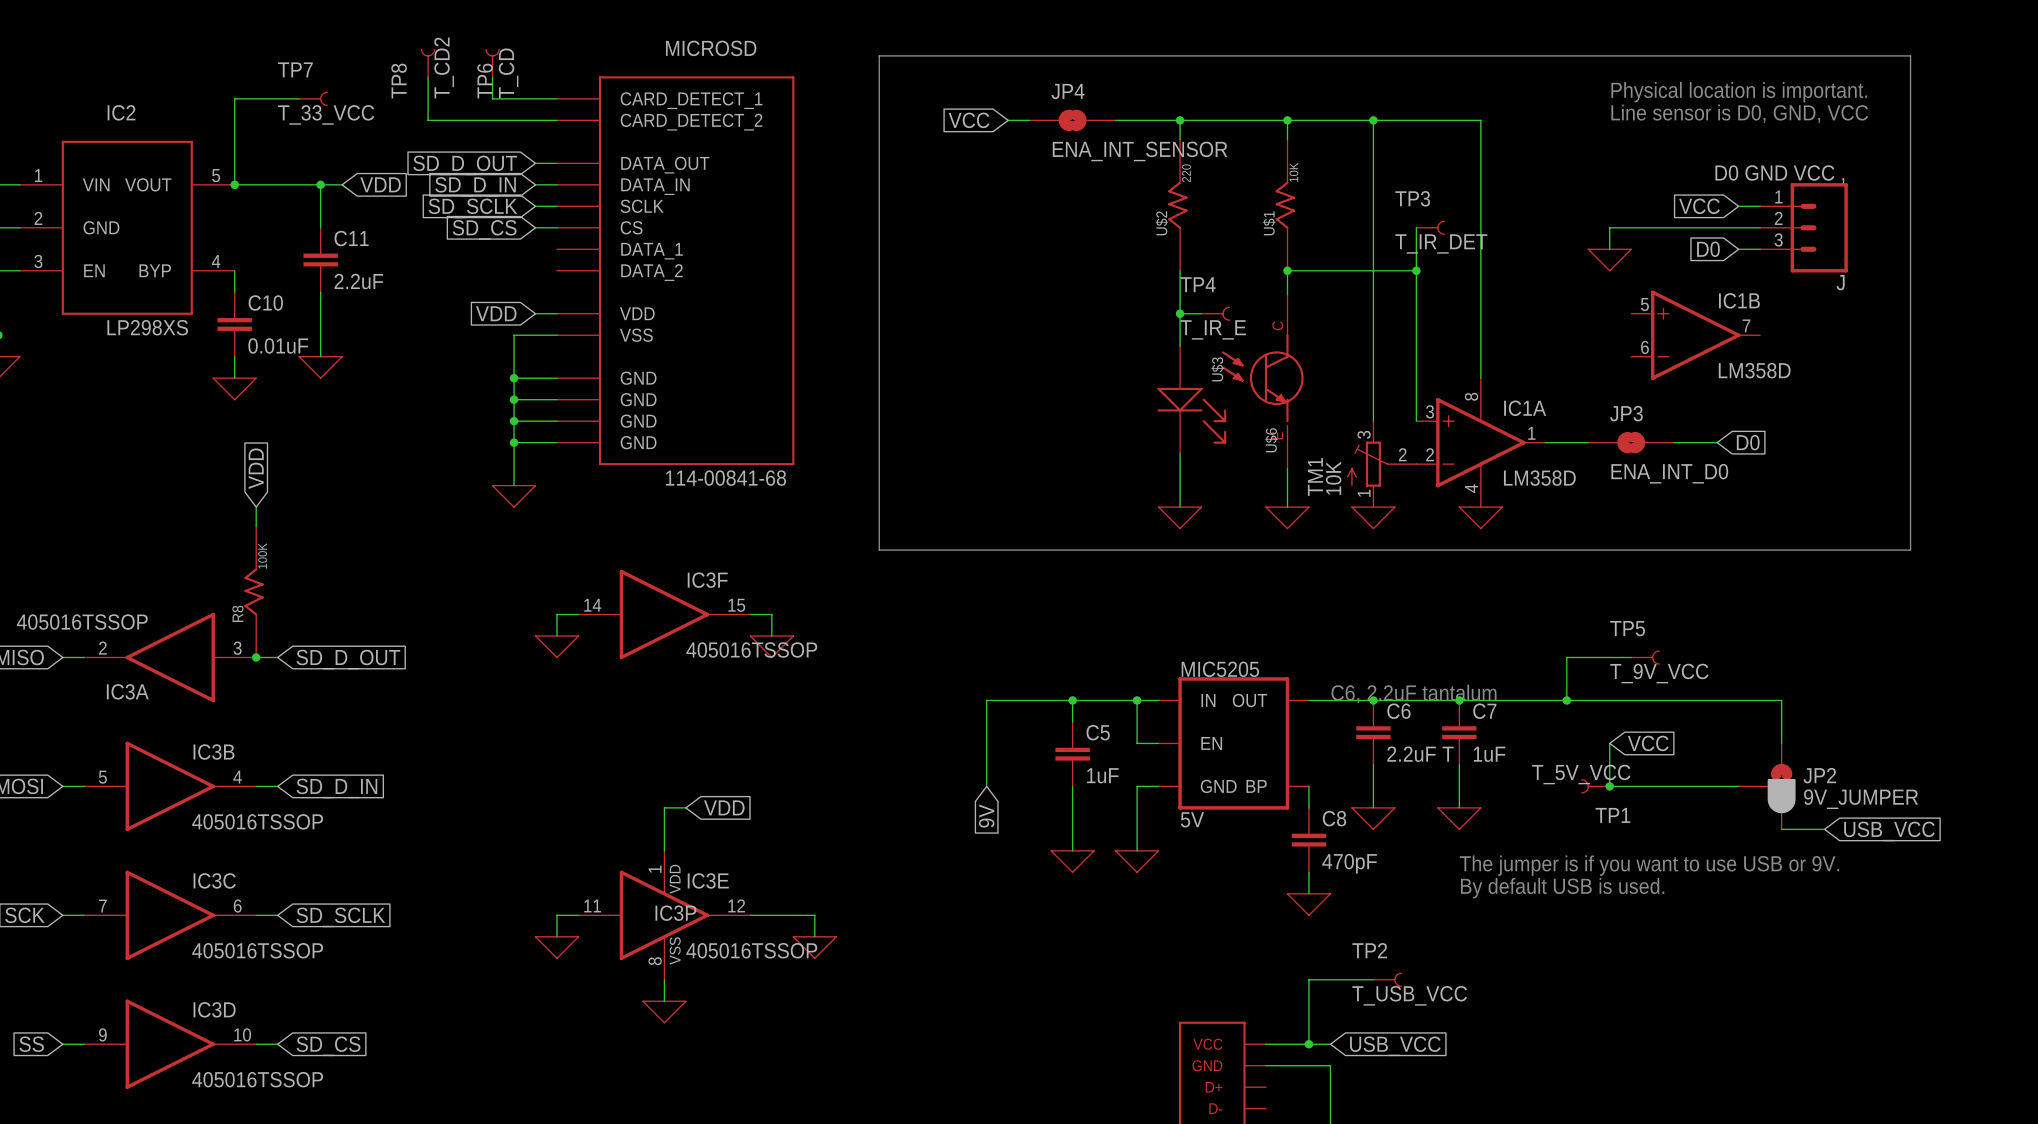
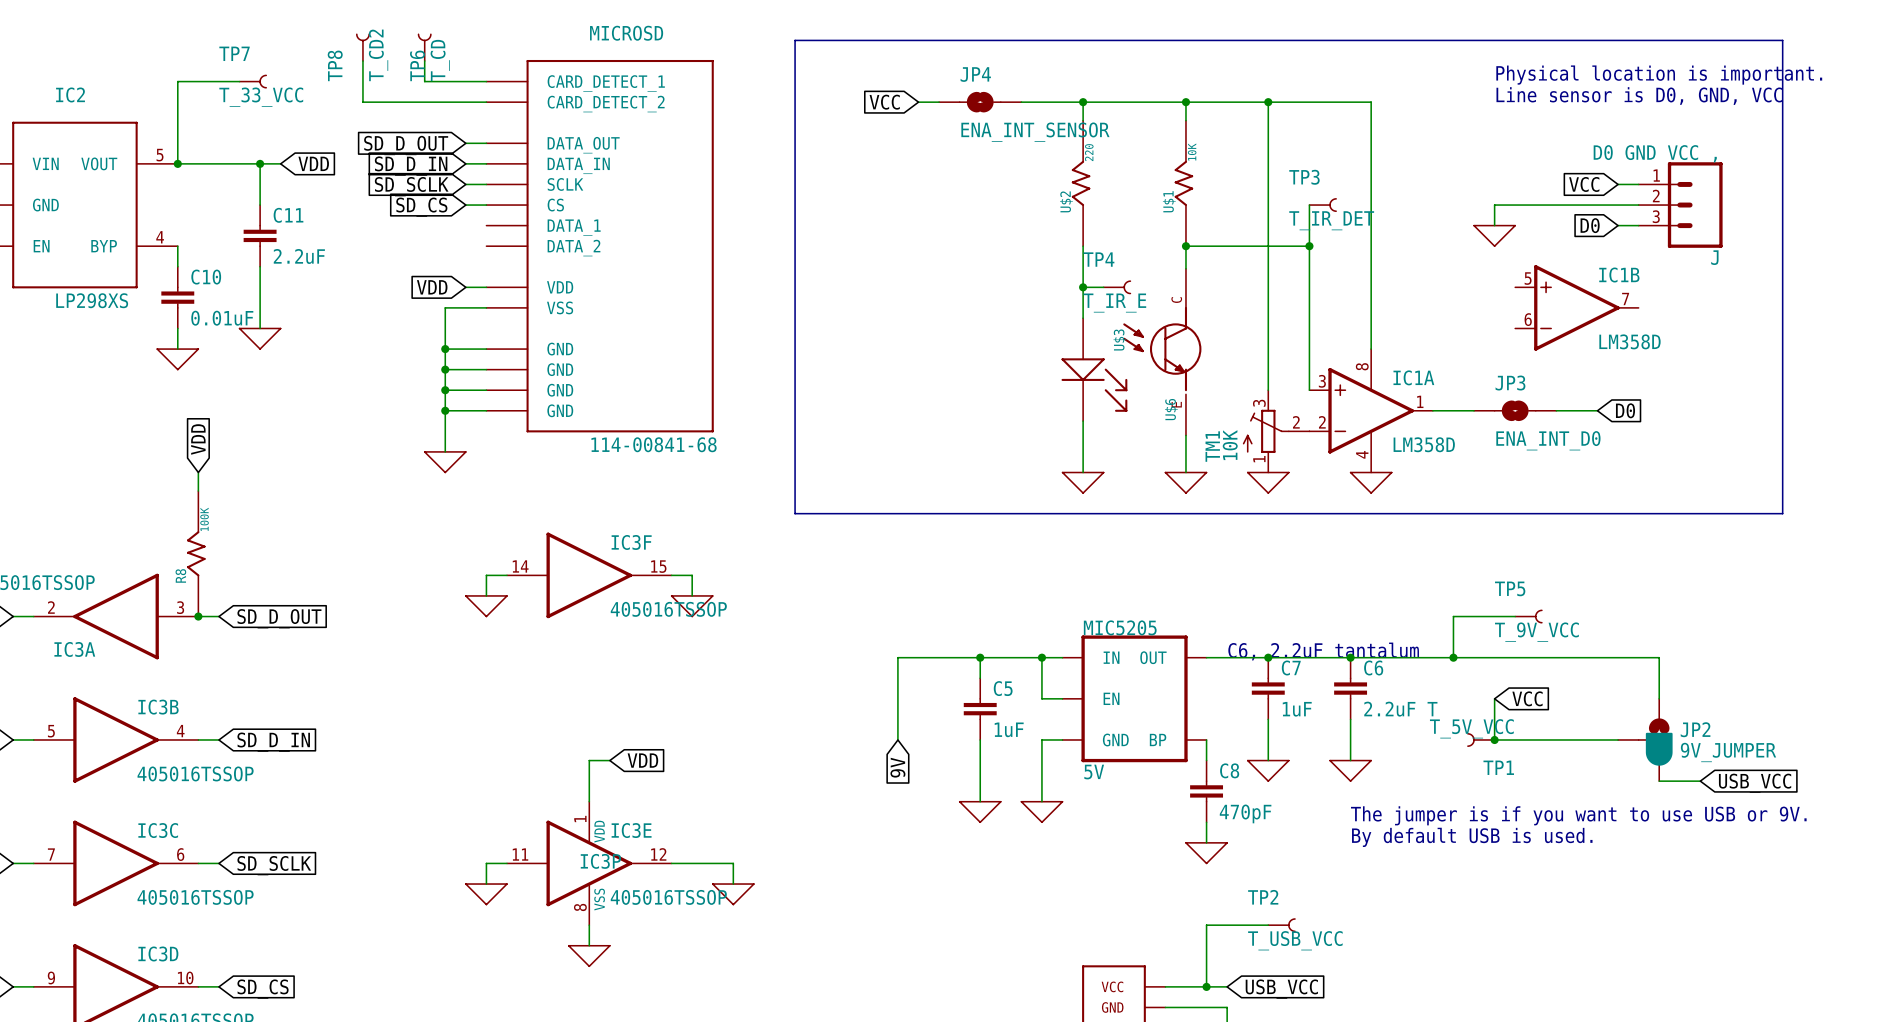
C6 name: C6 (1398, 711) -> C7 (1291, 667)
C7 name: C7 (1484, 711) -> C6 (1373, 667)
C6 value: 2.2uF T (1420, 754) -> 1uF (1297, 709)
C7 value: 1uF (1489, 754) -> 2.2uF T (1400, 709)

